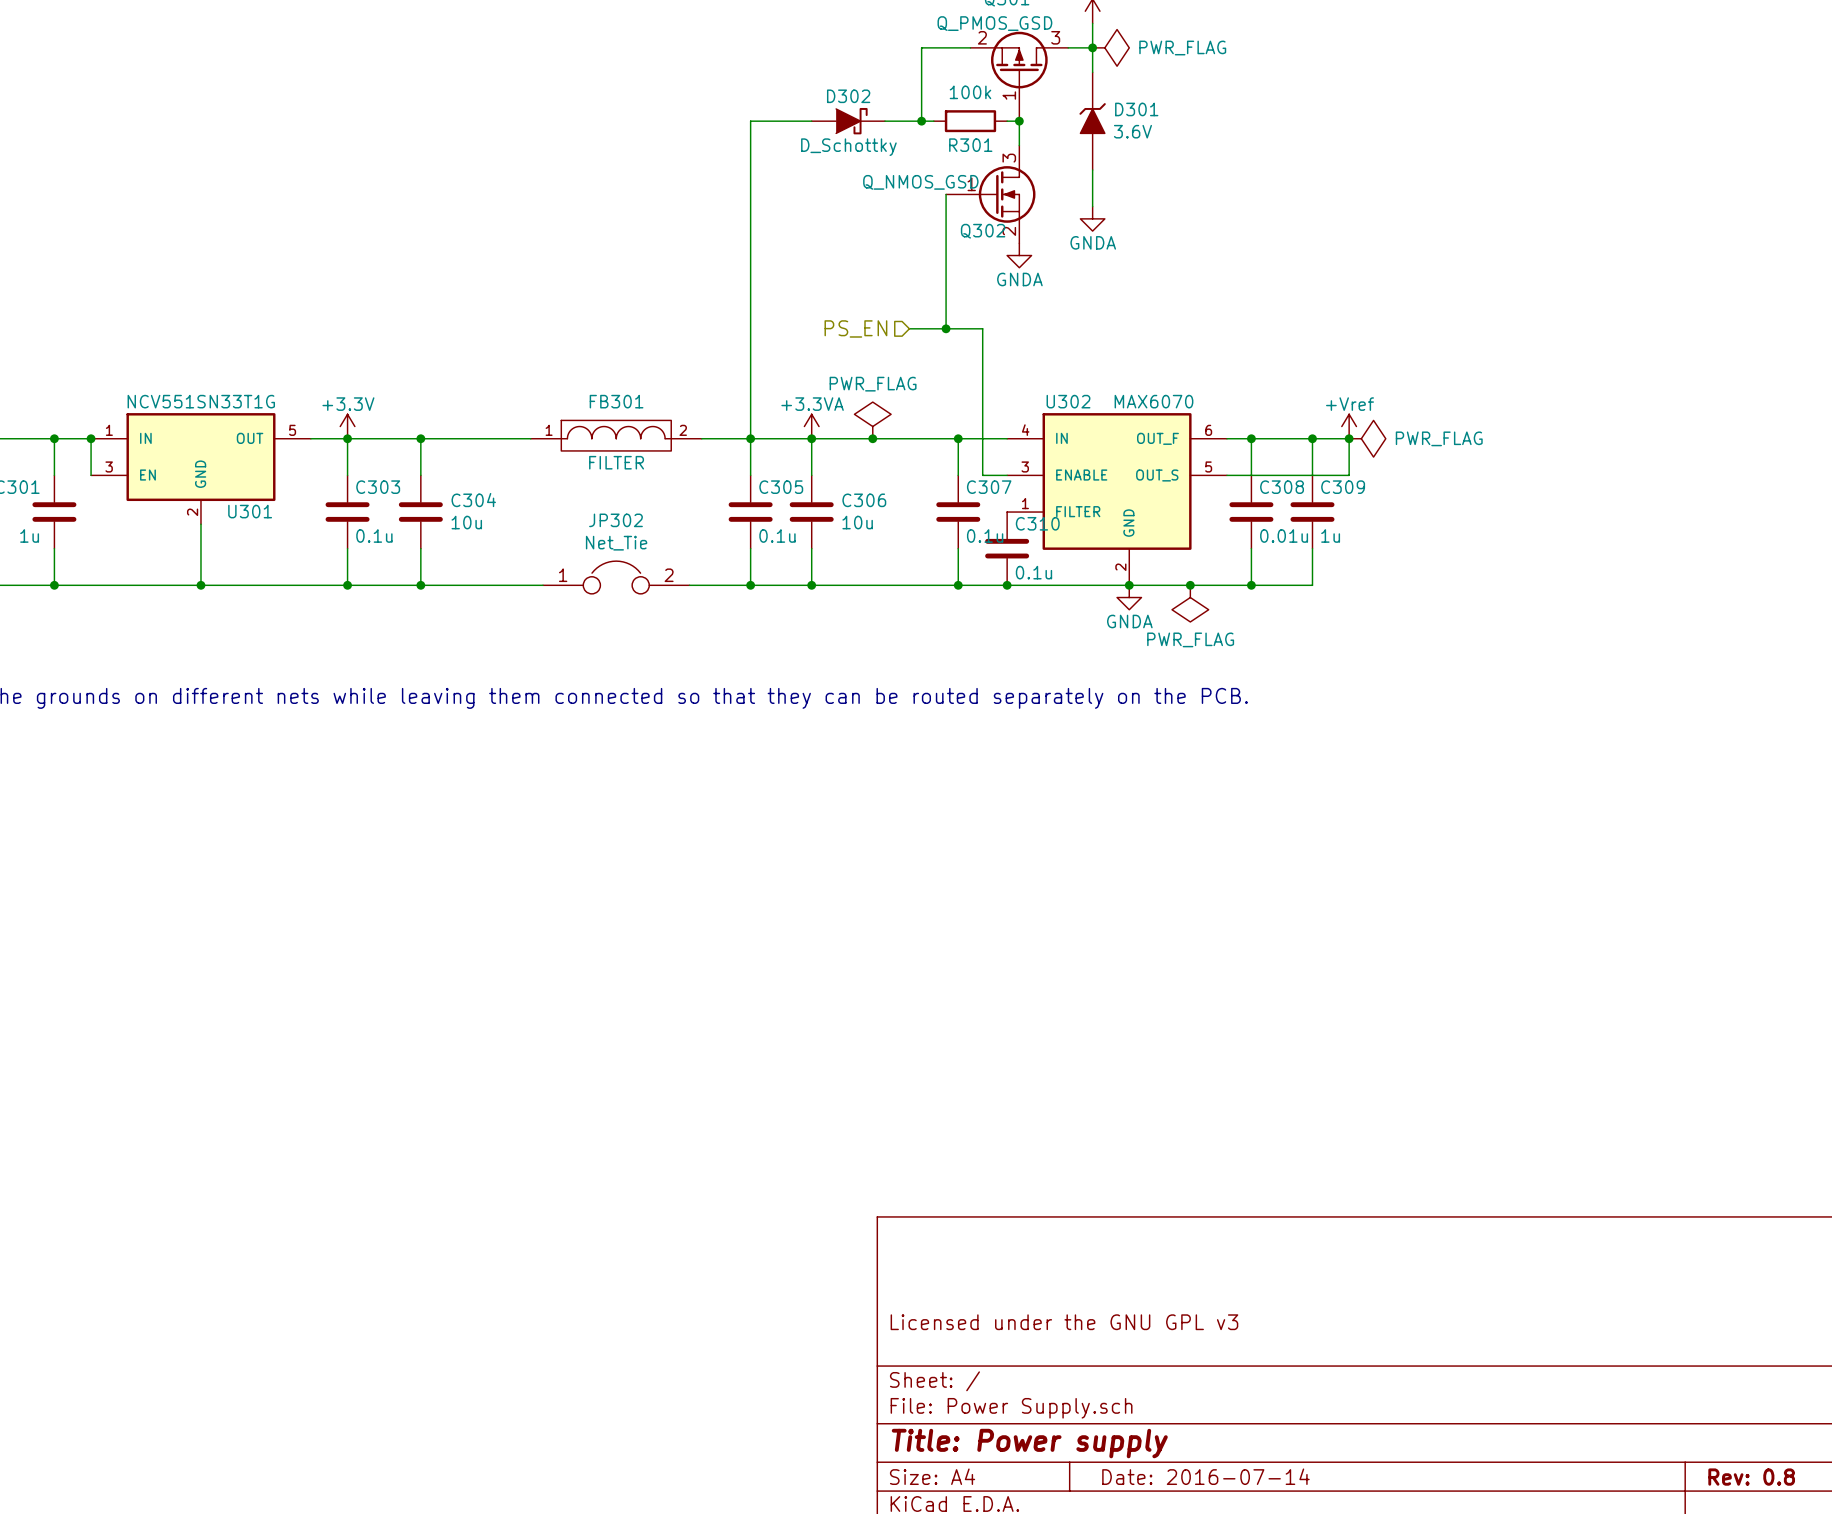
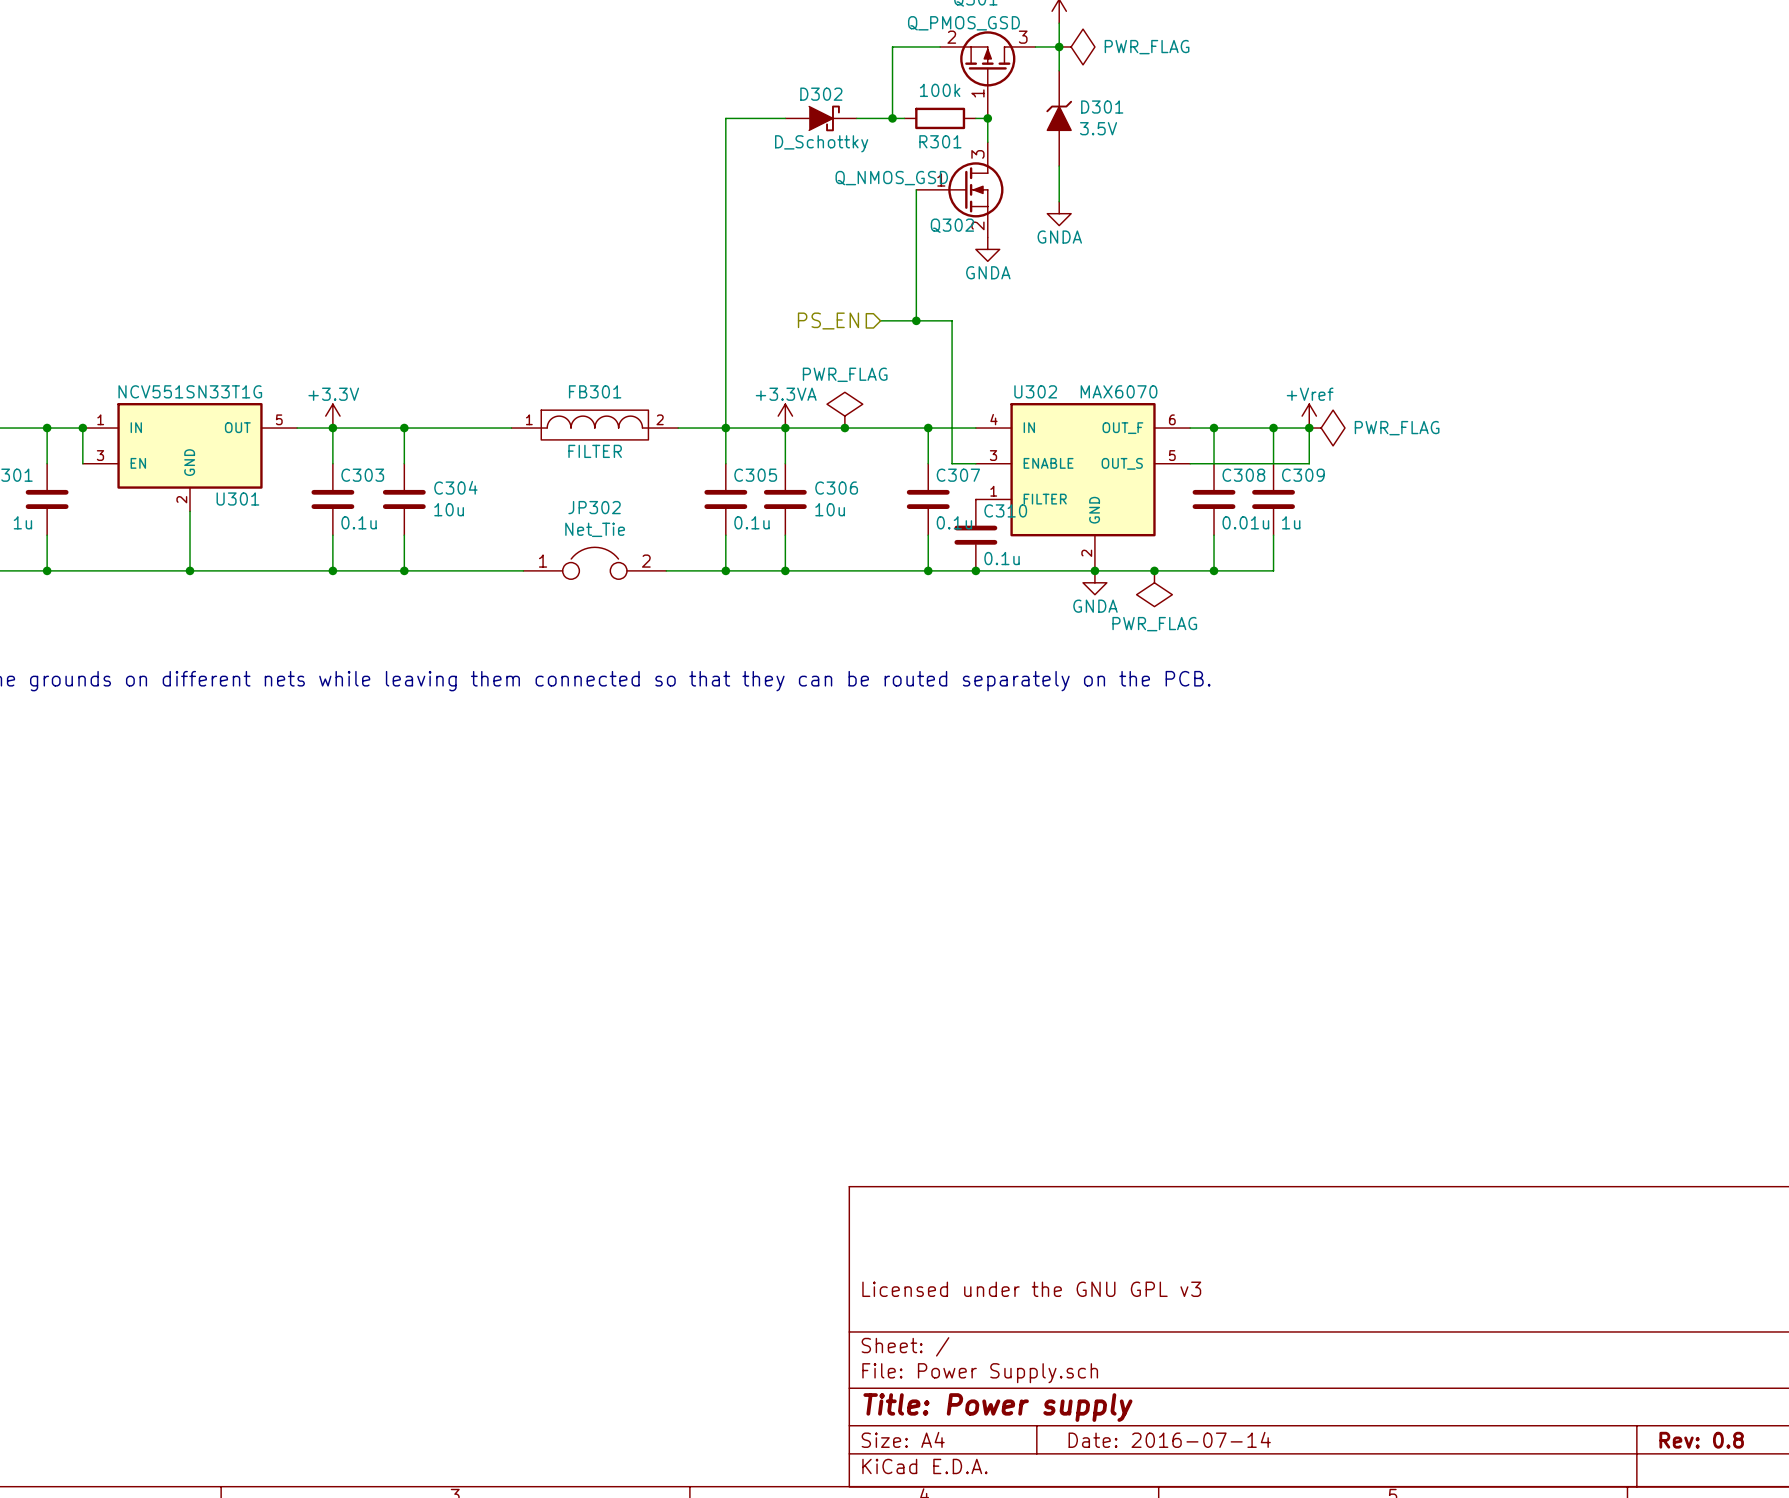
D301 value: 3.6V (1132, 131) -> 3.5V (1098, 128)

